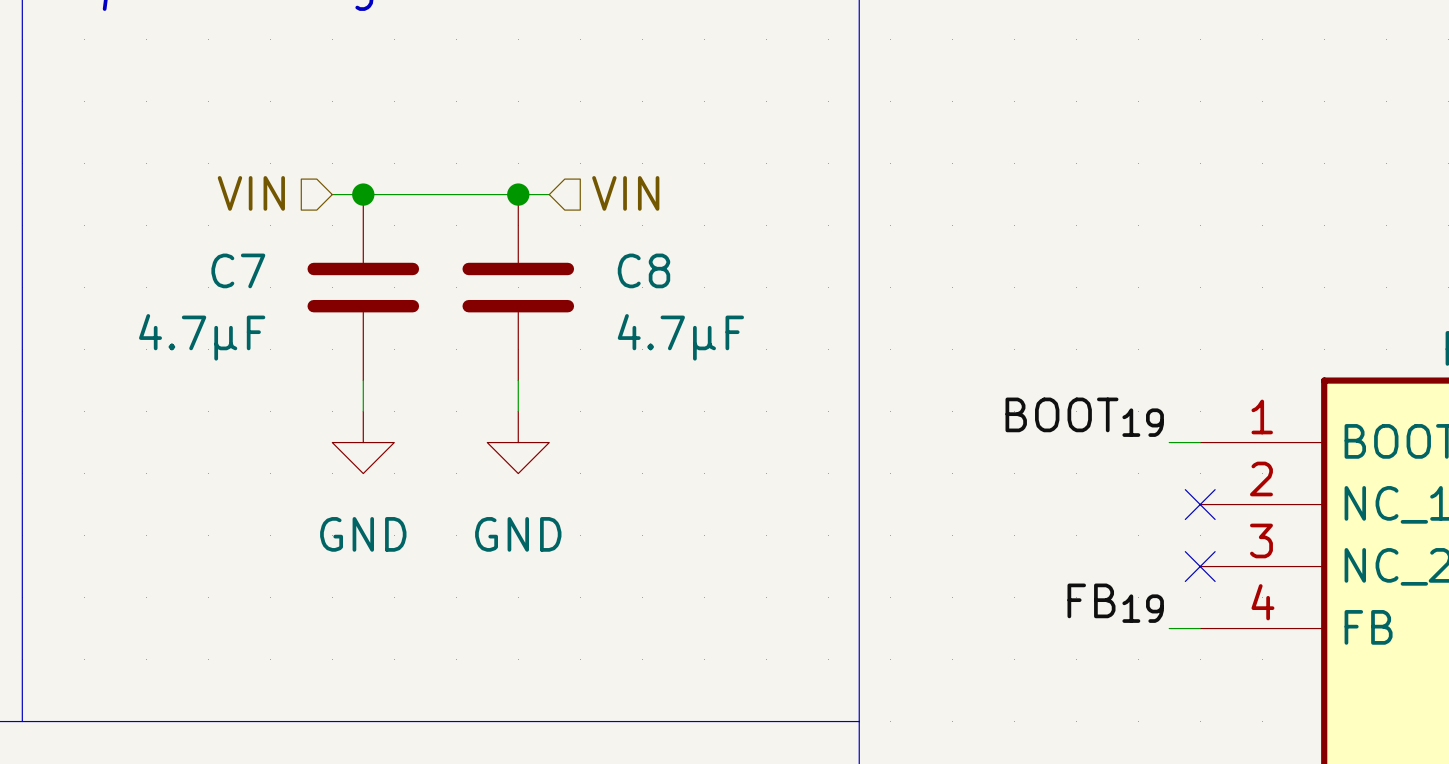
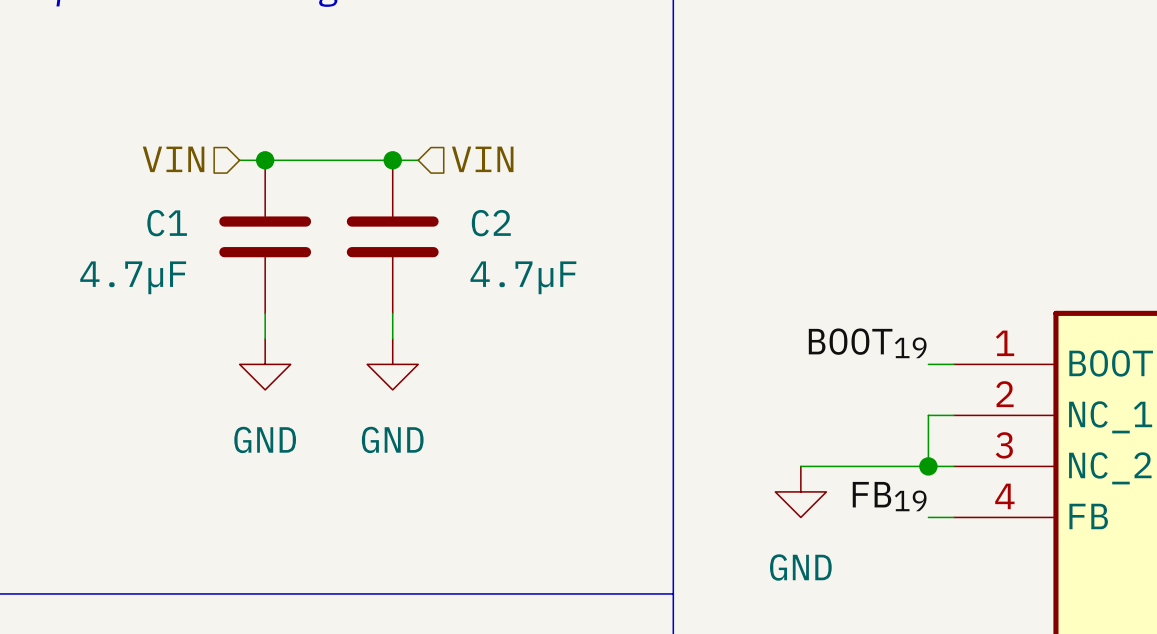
C7 name: C7 (238, 270) -> C1 (167, 223)
C8 name: C8 (643, 270) -> C2 (491, 223)
wire: none -> (953, 415) (928, 415) (928, 466)
no-connect mark: (1200, 504) -> none
wire: none -> (800, 466) (953, 466)
junction: none -> (928, 466)
no-connect mark: (1200, 566) -> none
power symbol: none -> GND (800, 491)

